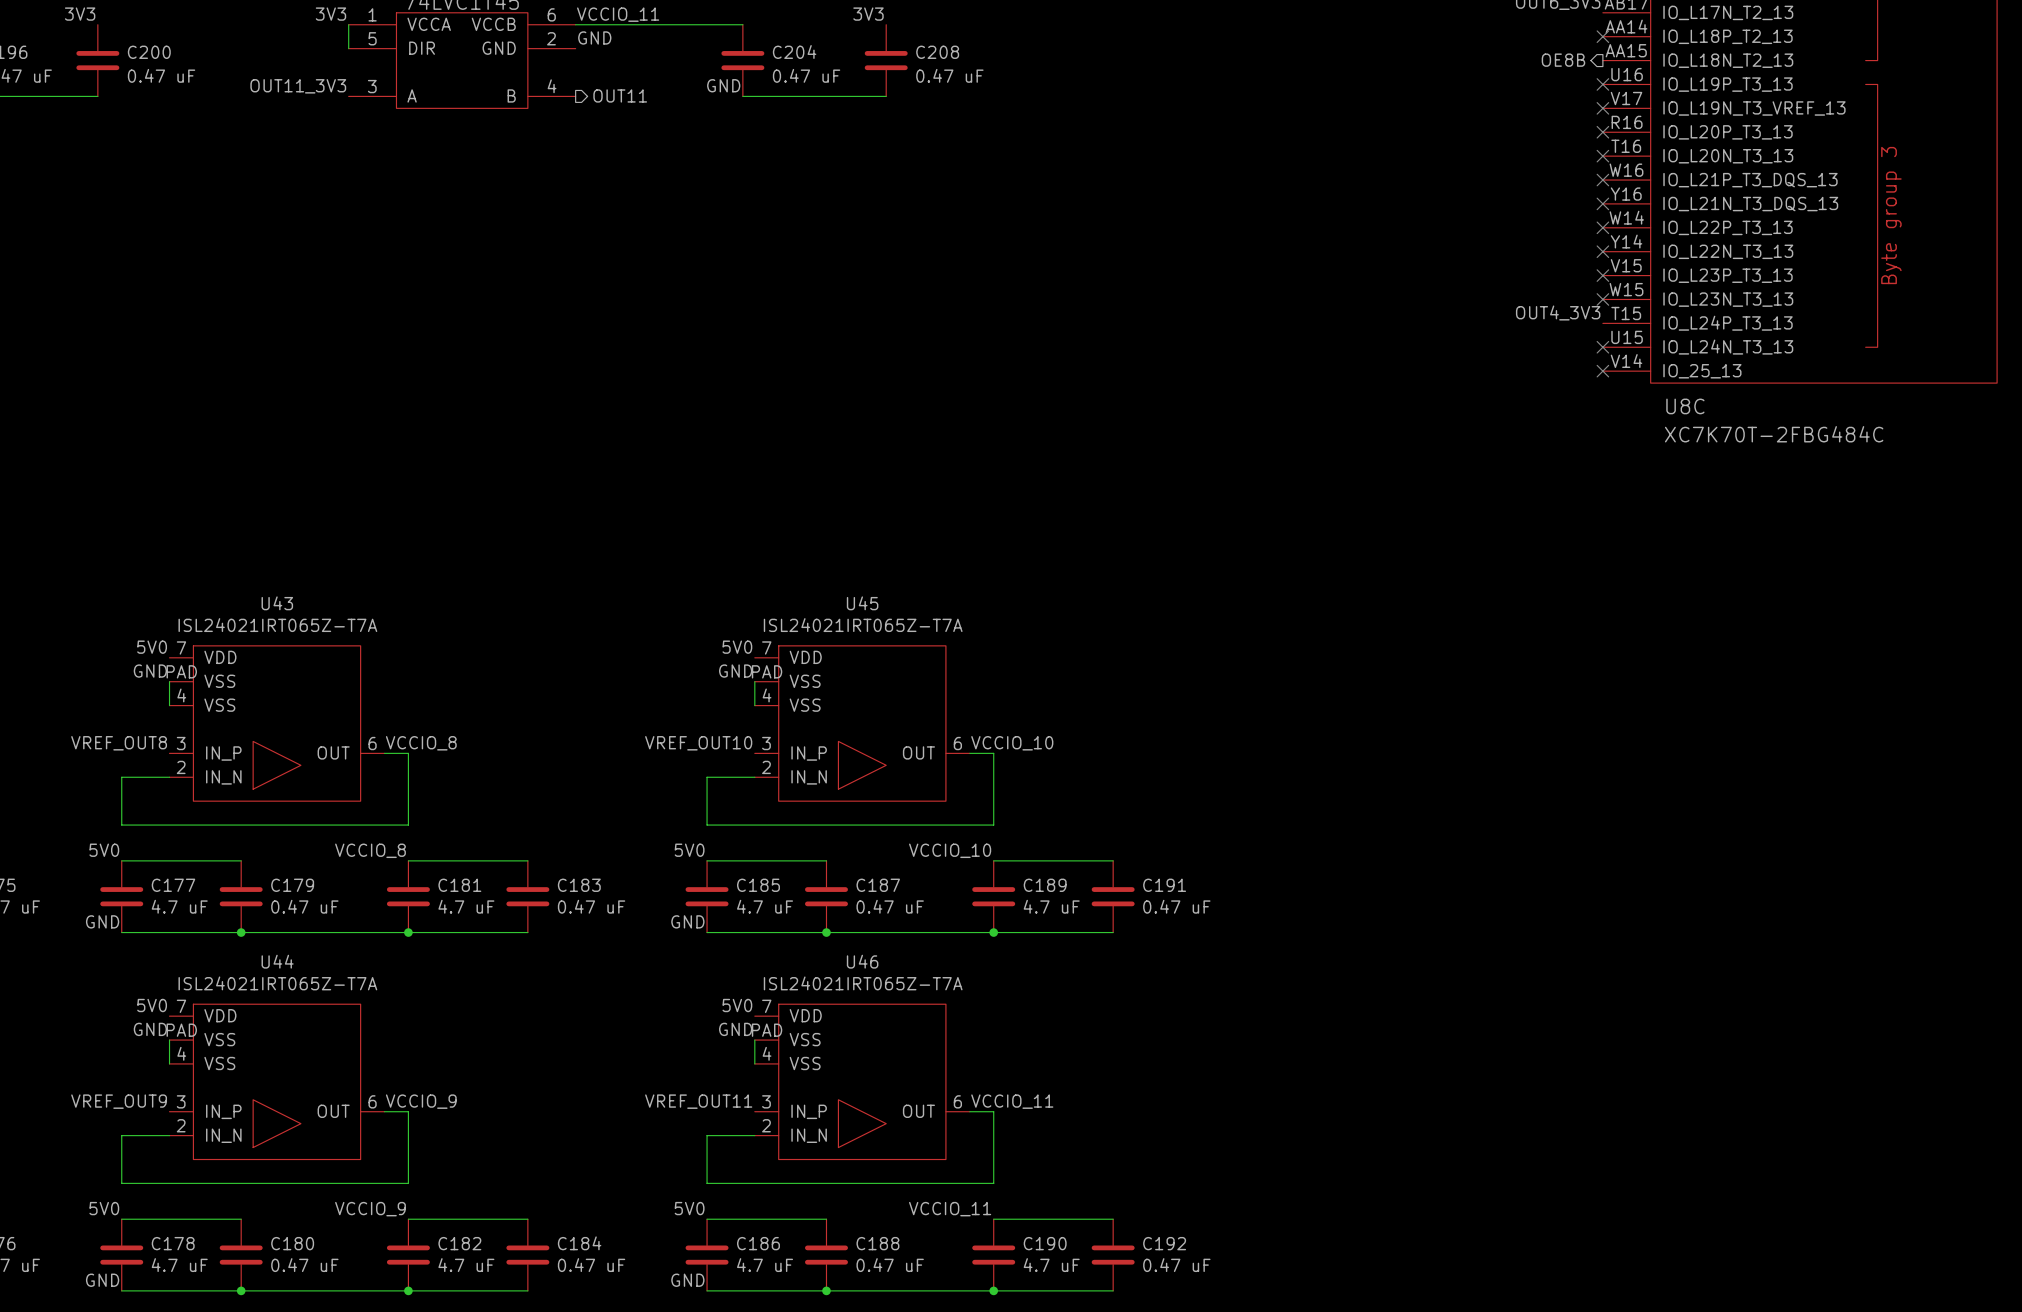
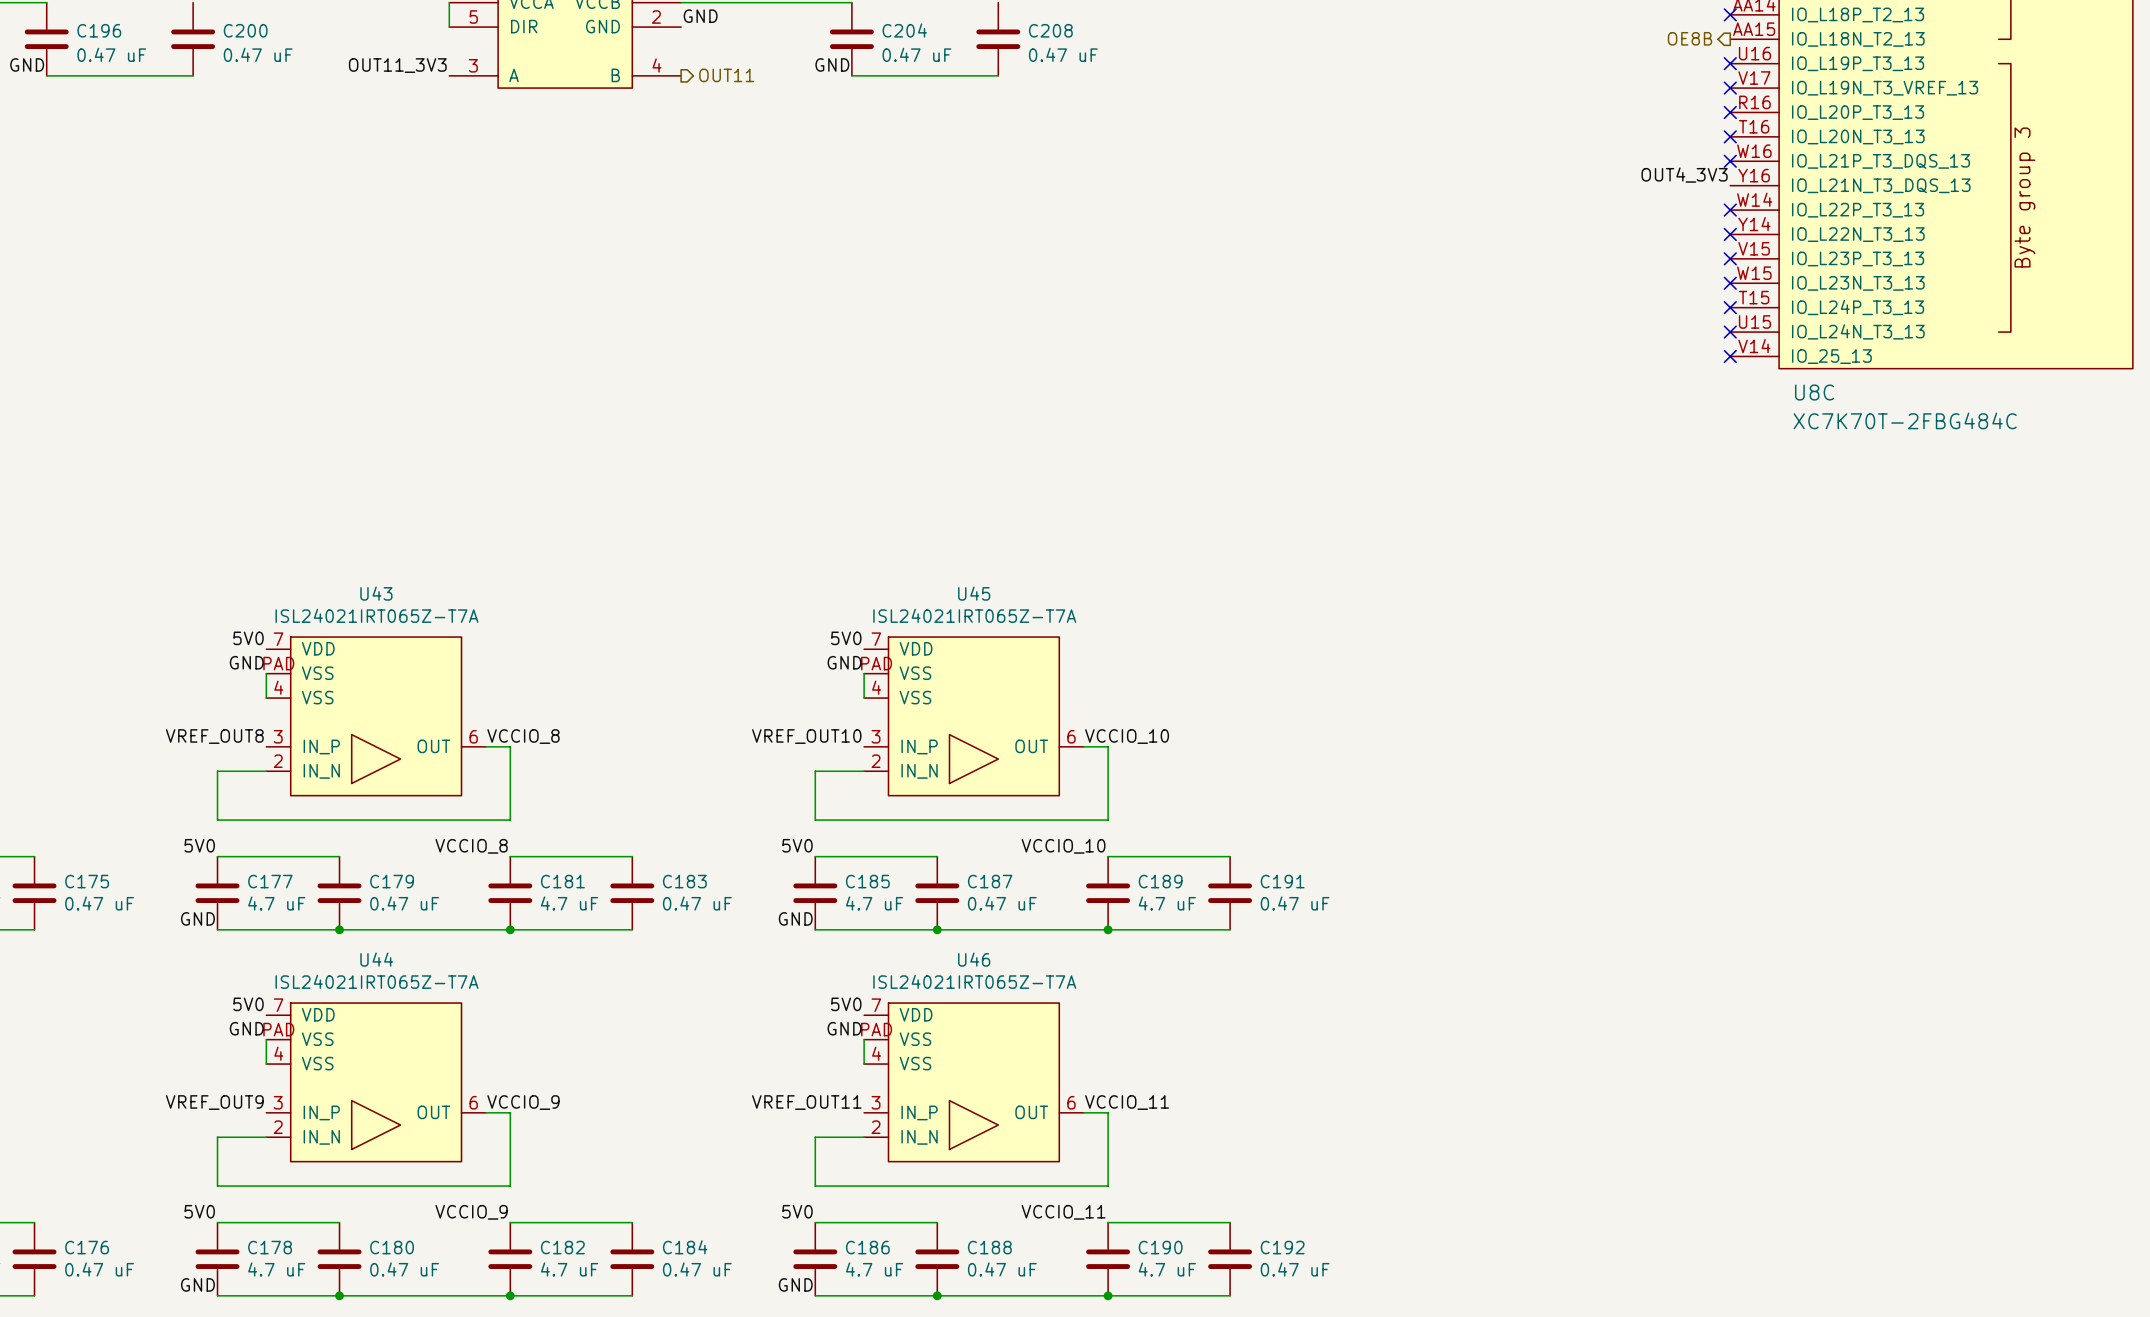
no-connect mark: (1602, 203) -> none
label position: OUT4_3V3 (1558, 312) -> OUT4_3V3 (1684, 175)
no-connect mark: none -> (1730, 307)

